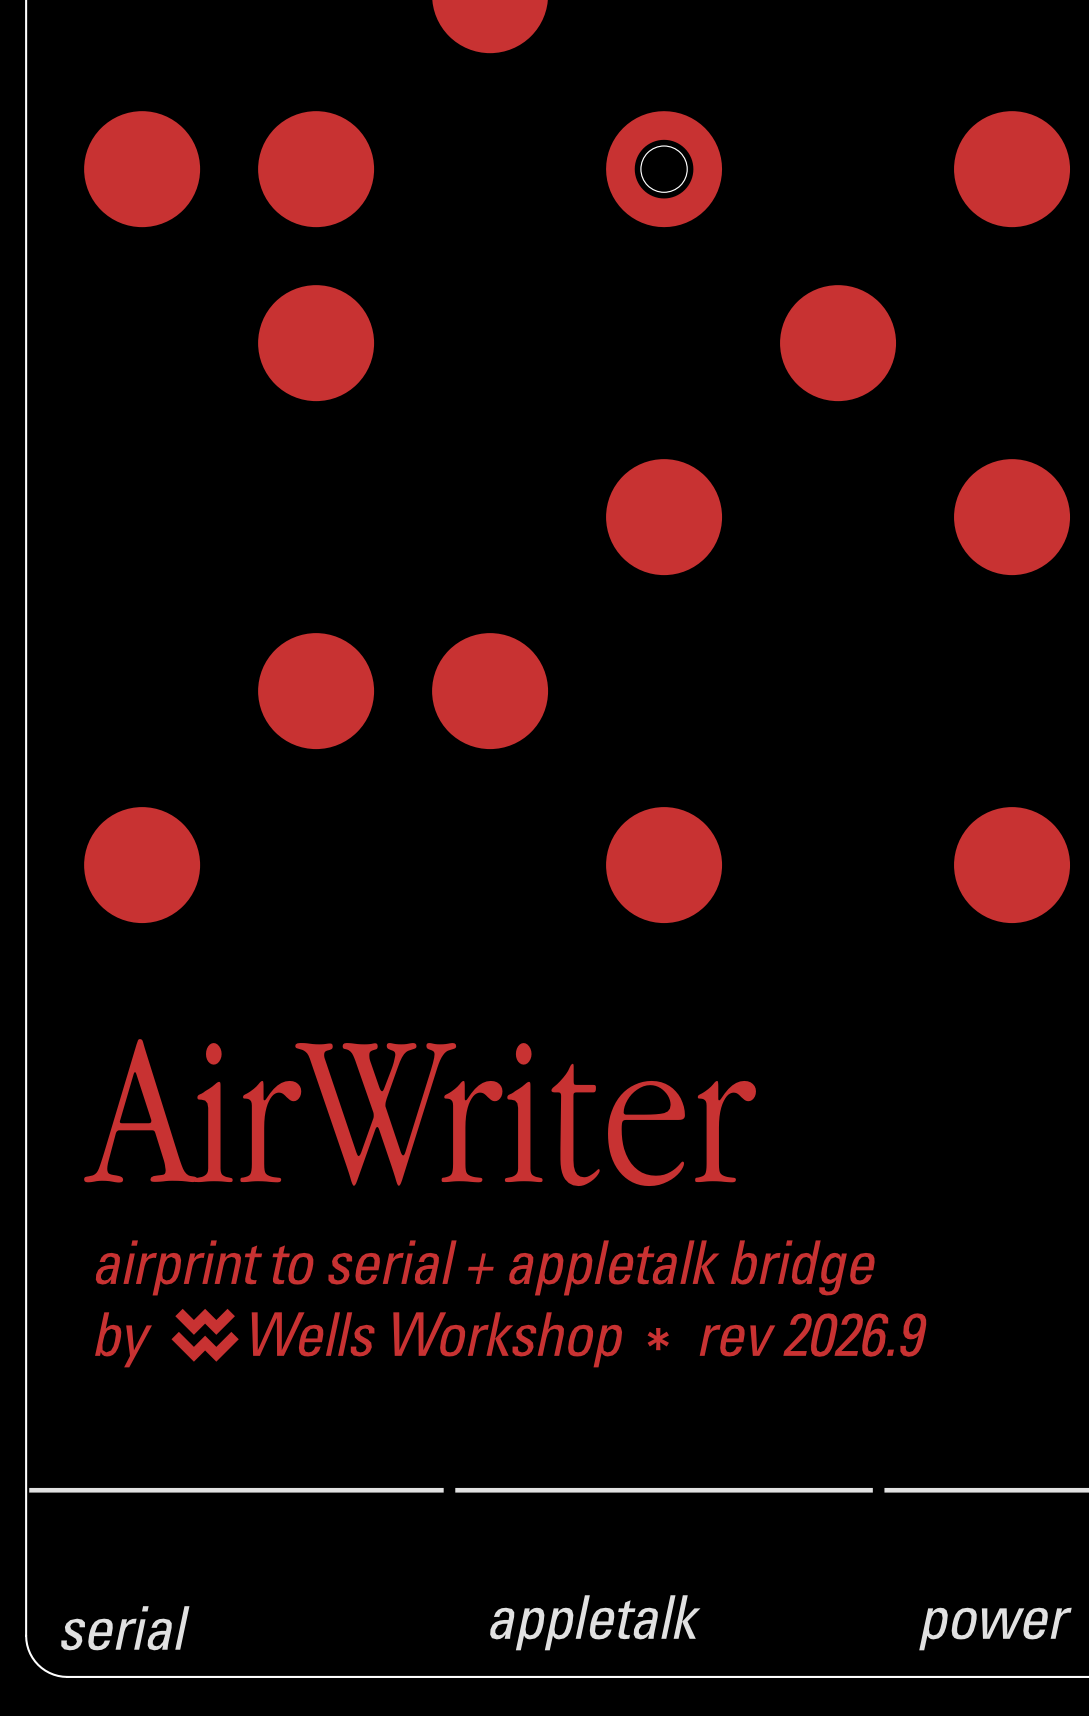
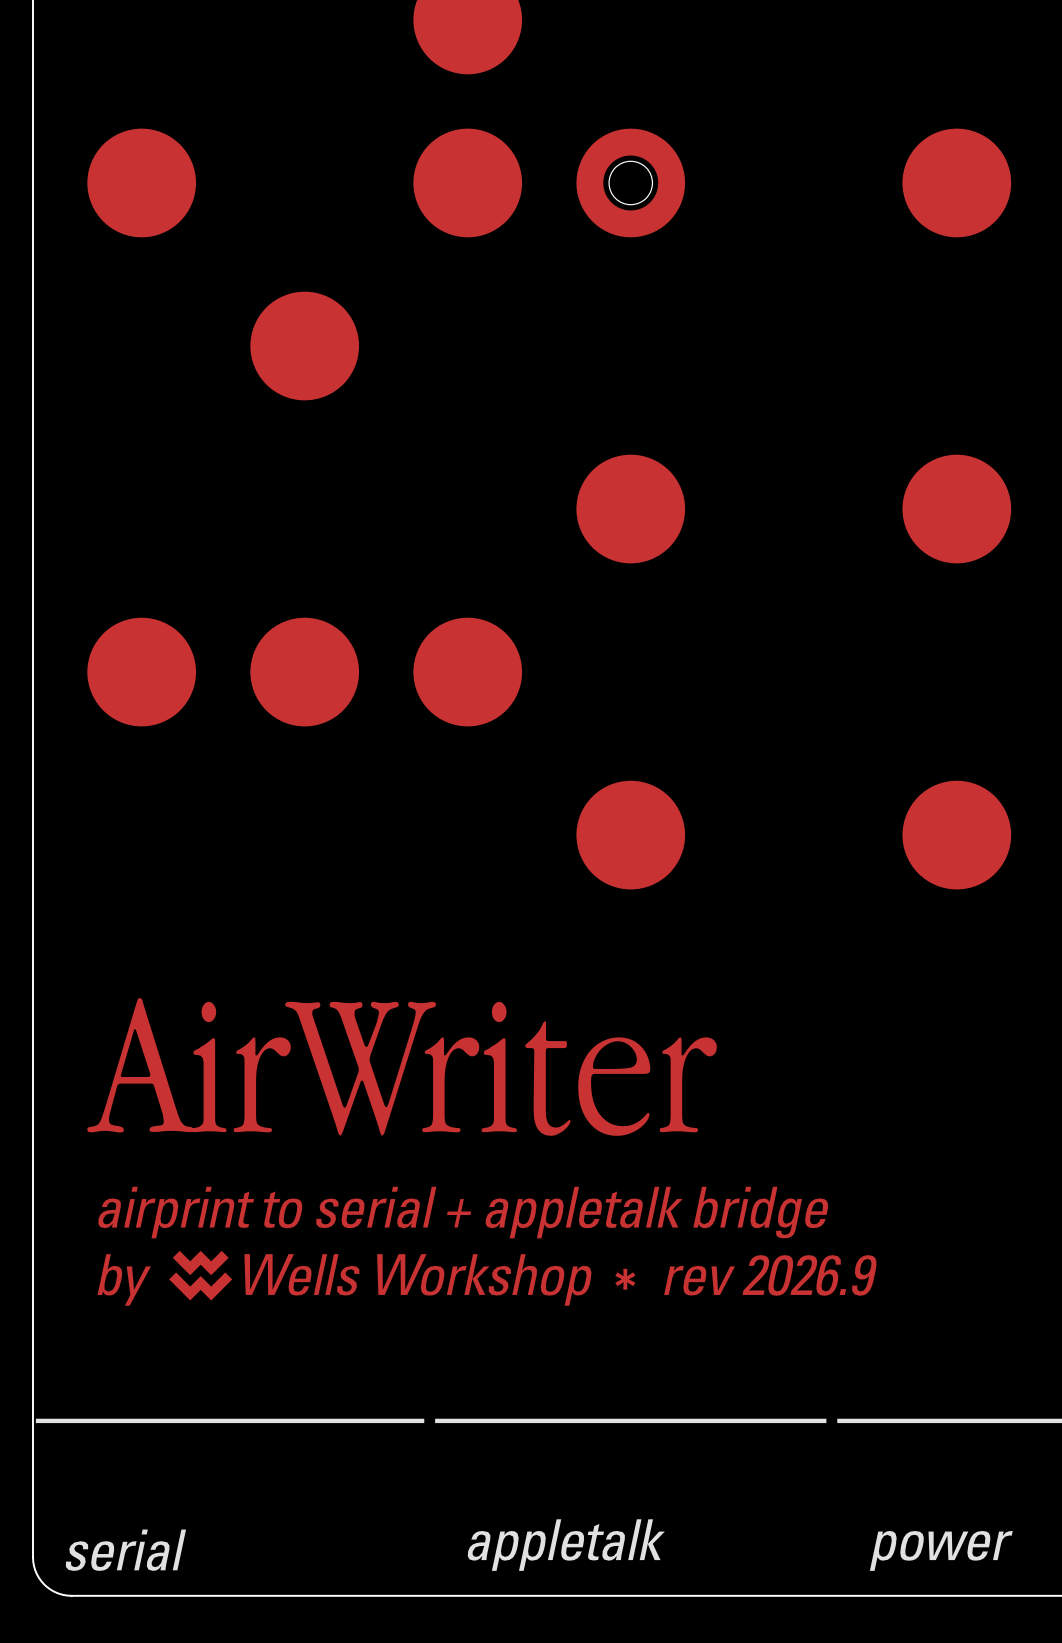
drawing position: (316, 169) -> (467, 182)
drawing: [780, 285, 897, 402] -> none
drawing position: (142, 865) -> (141, 672)

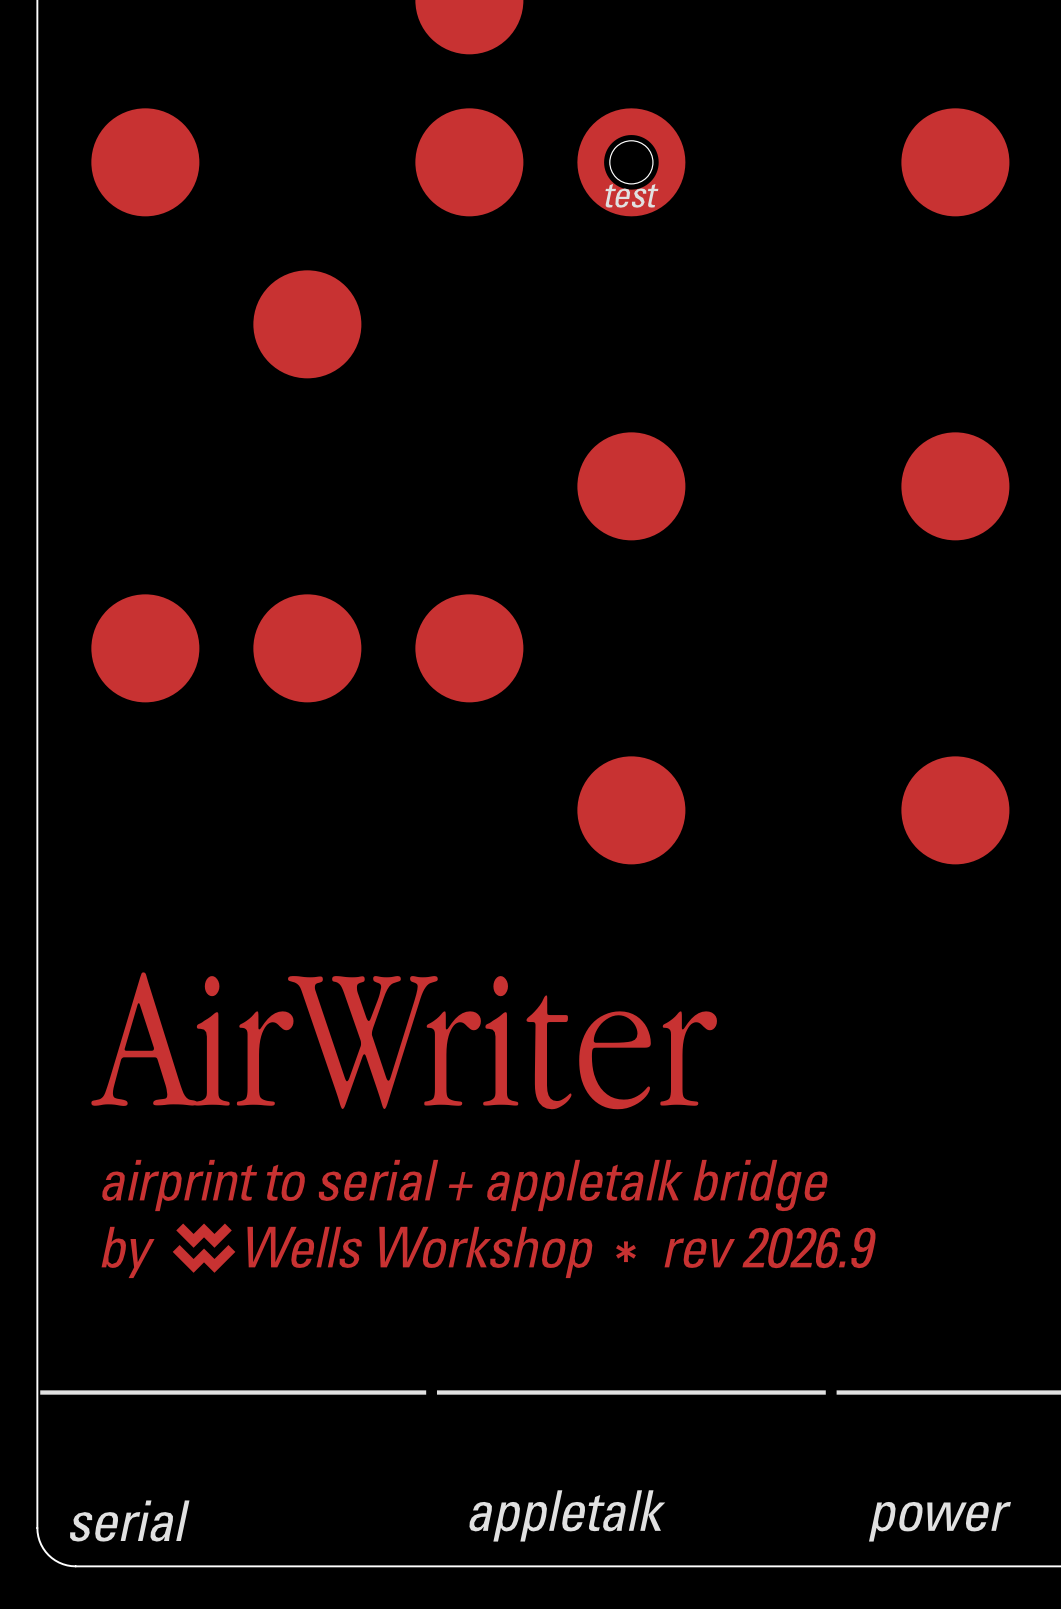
drawing: none -> [605, 183, 659, 208]

